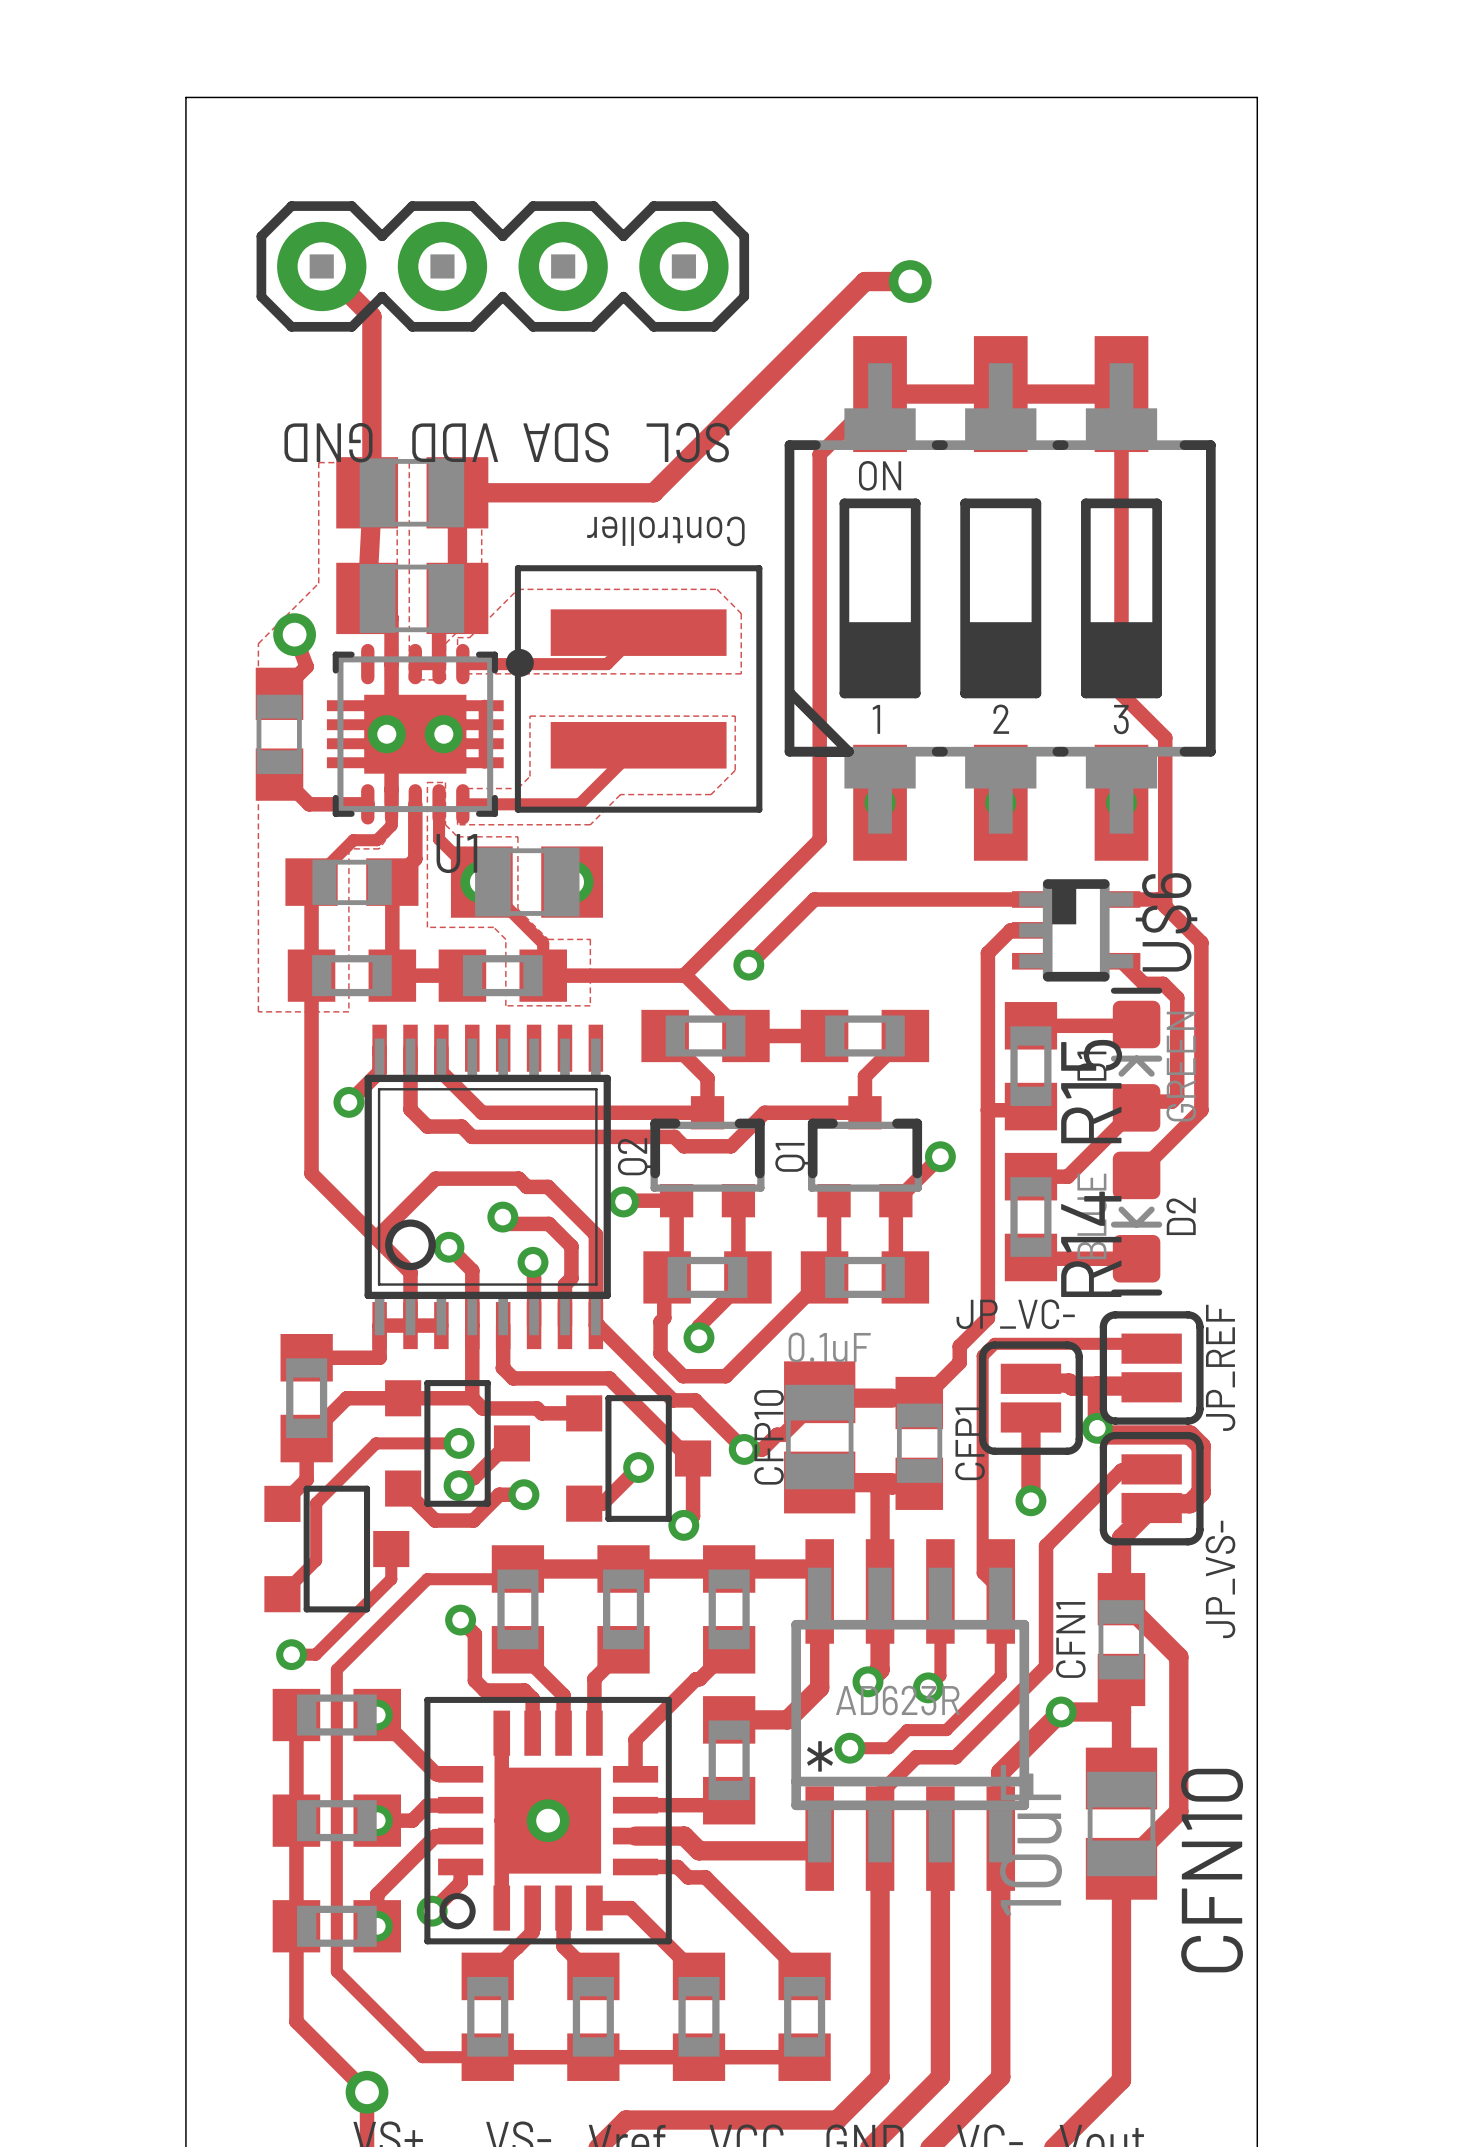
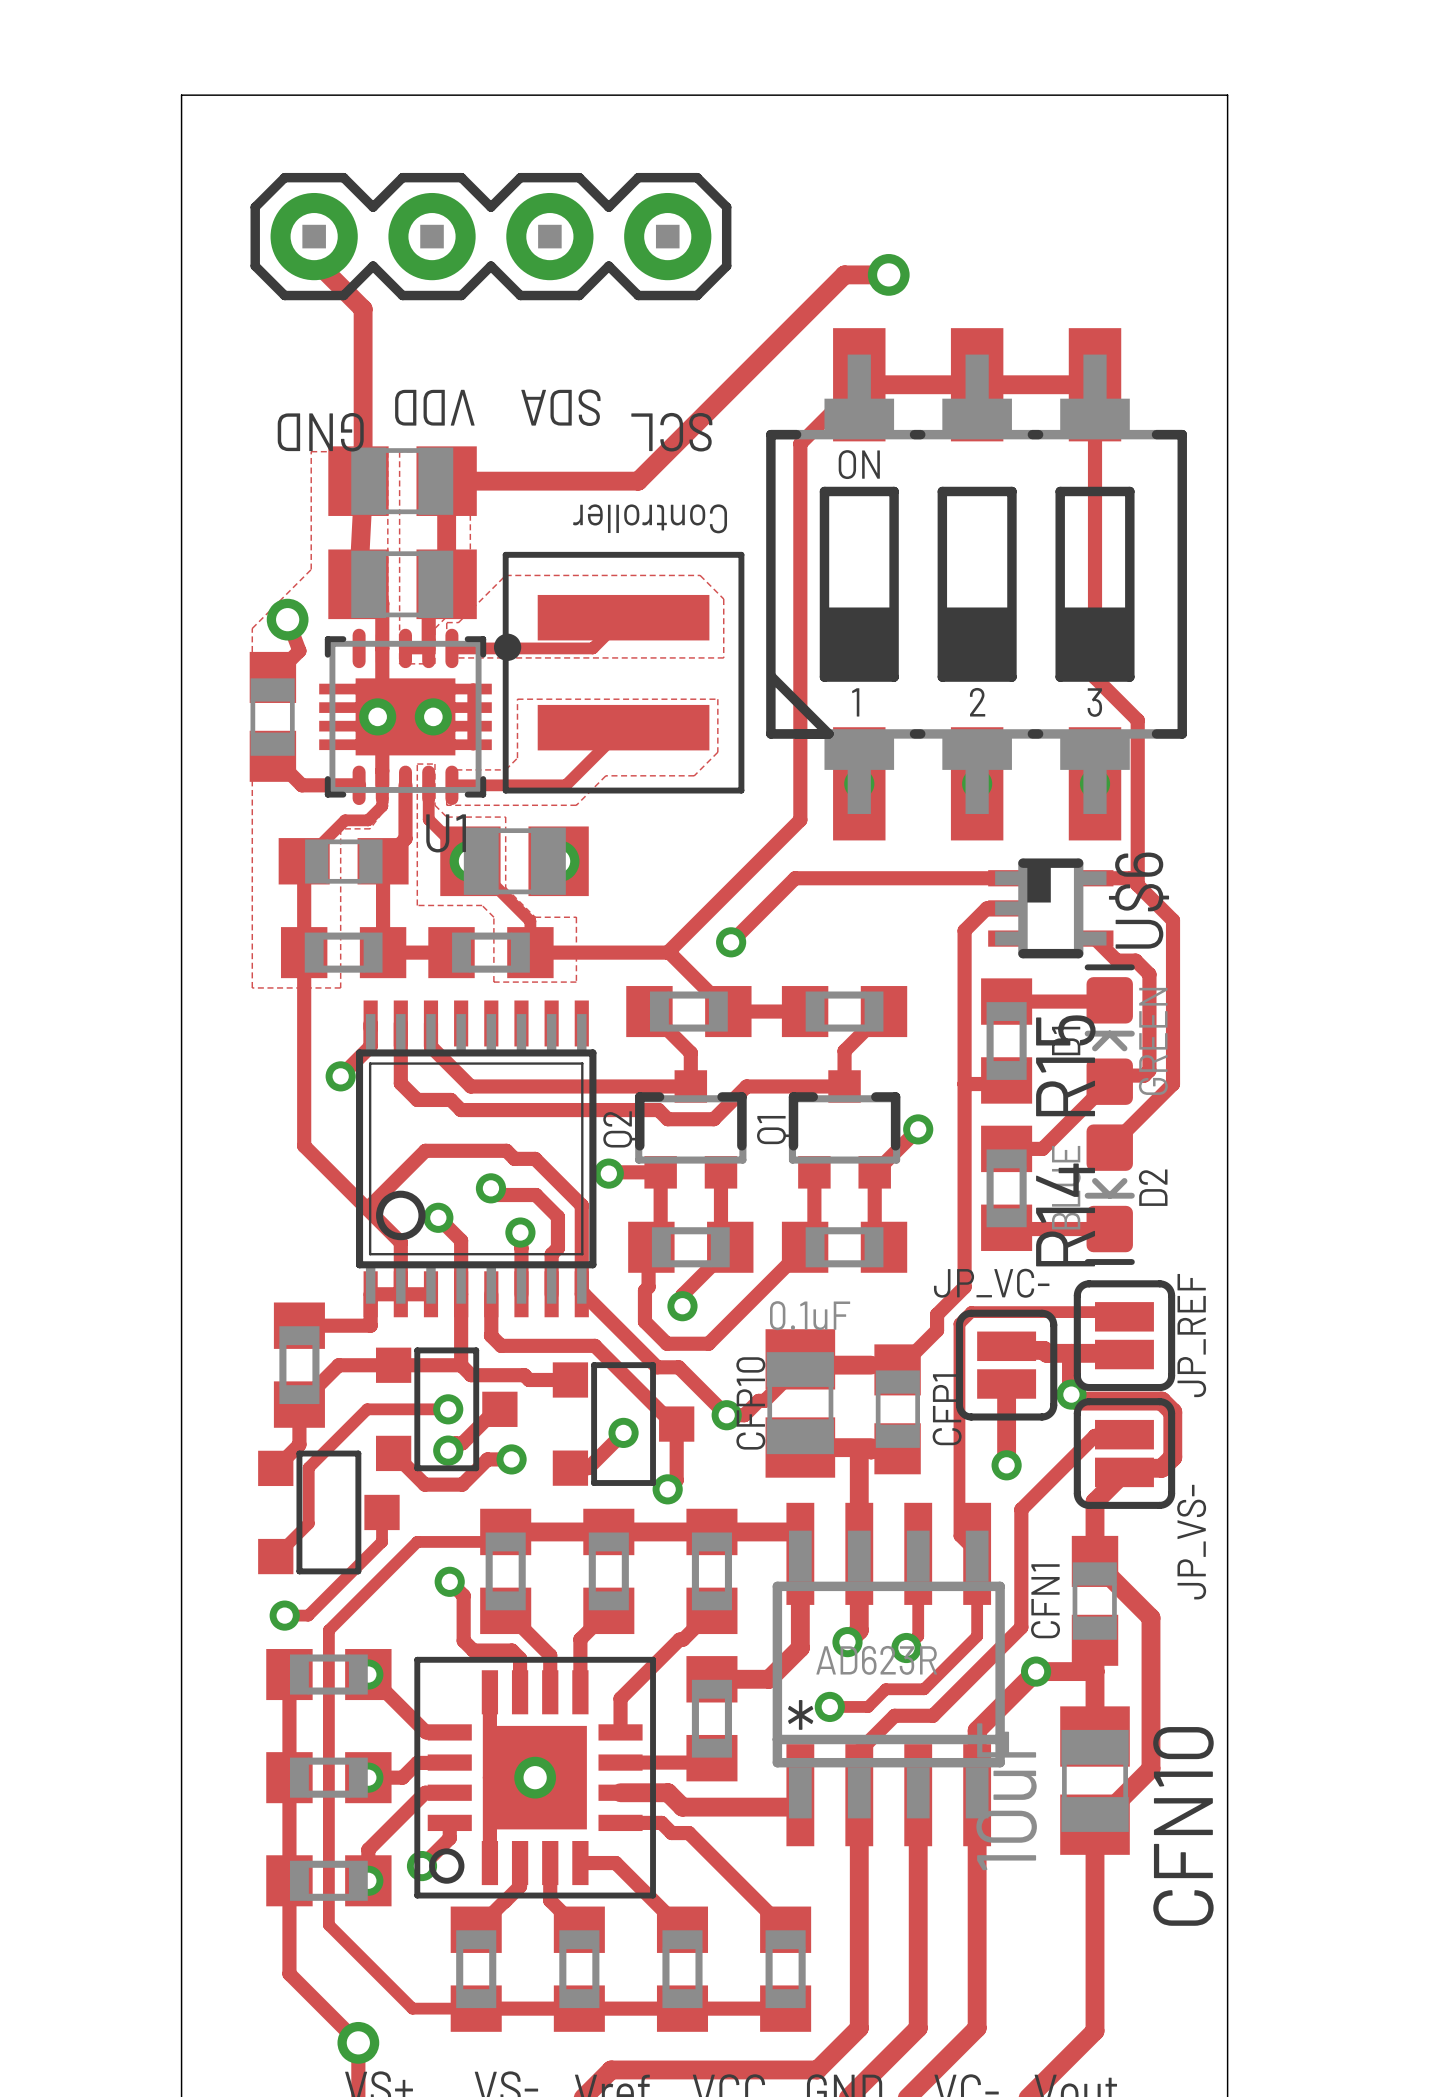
part position: (502, 266) -> (490, 236)
text position: VDD (455, 442) -> VDD (434, 407)
text position: SDA (566, 442) -> SDA (560, 407)

